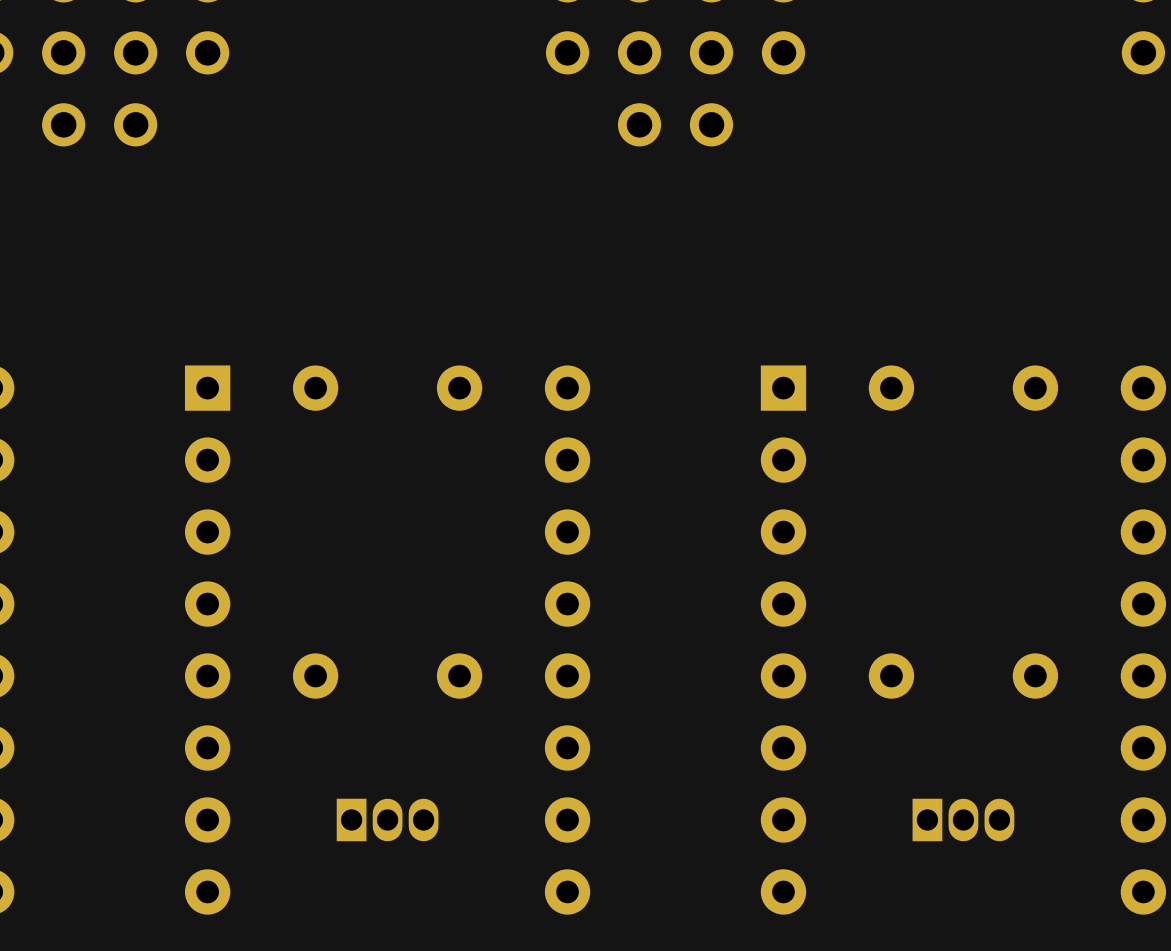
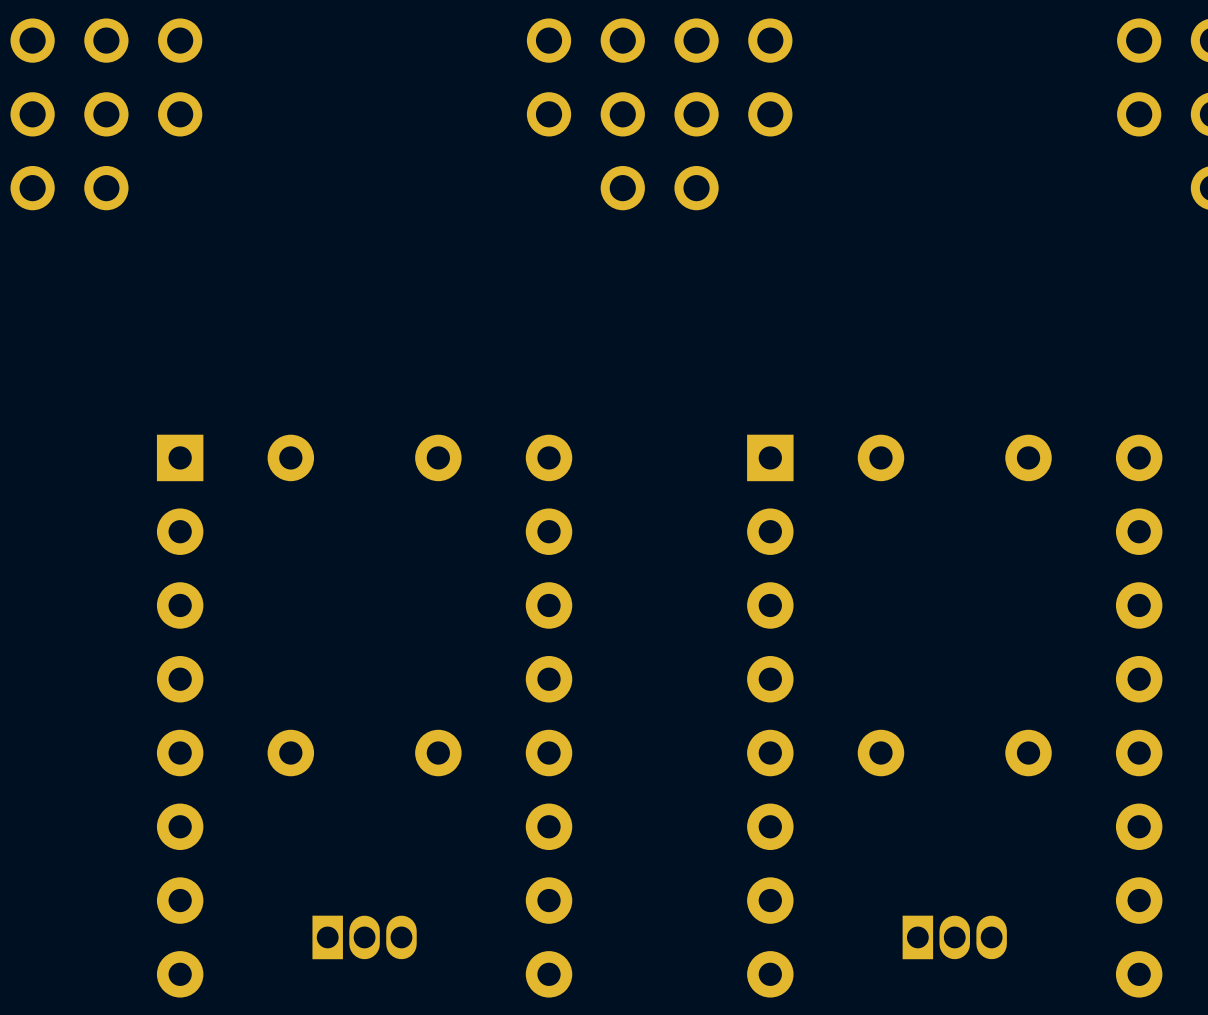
part position: (387, 819) -> (364, 937)
part position: (963, 819) -> (954, 937)

